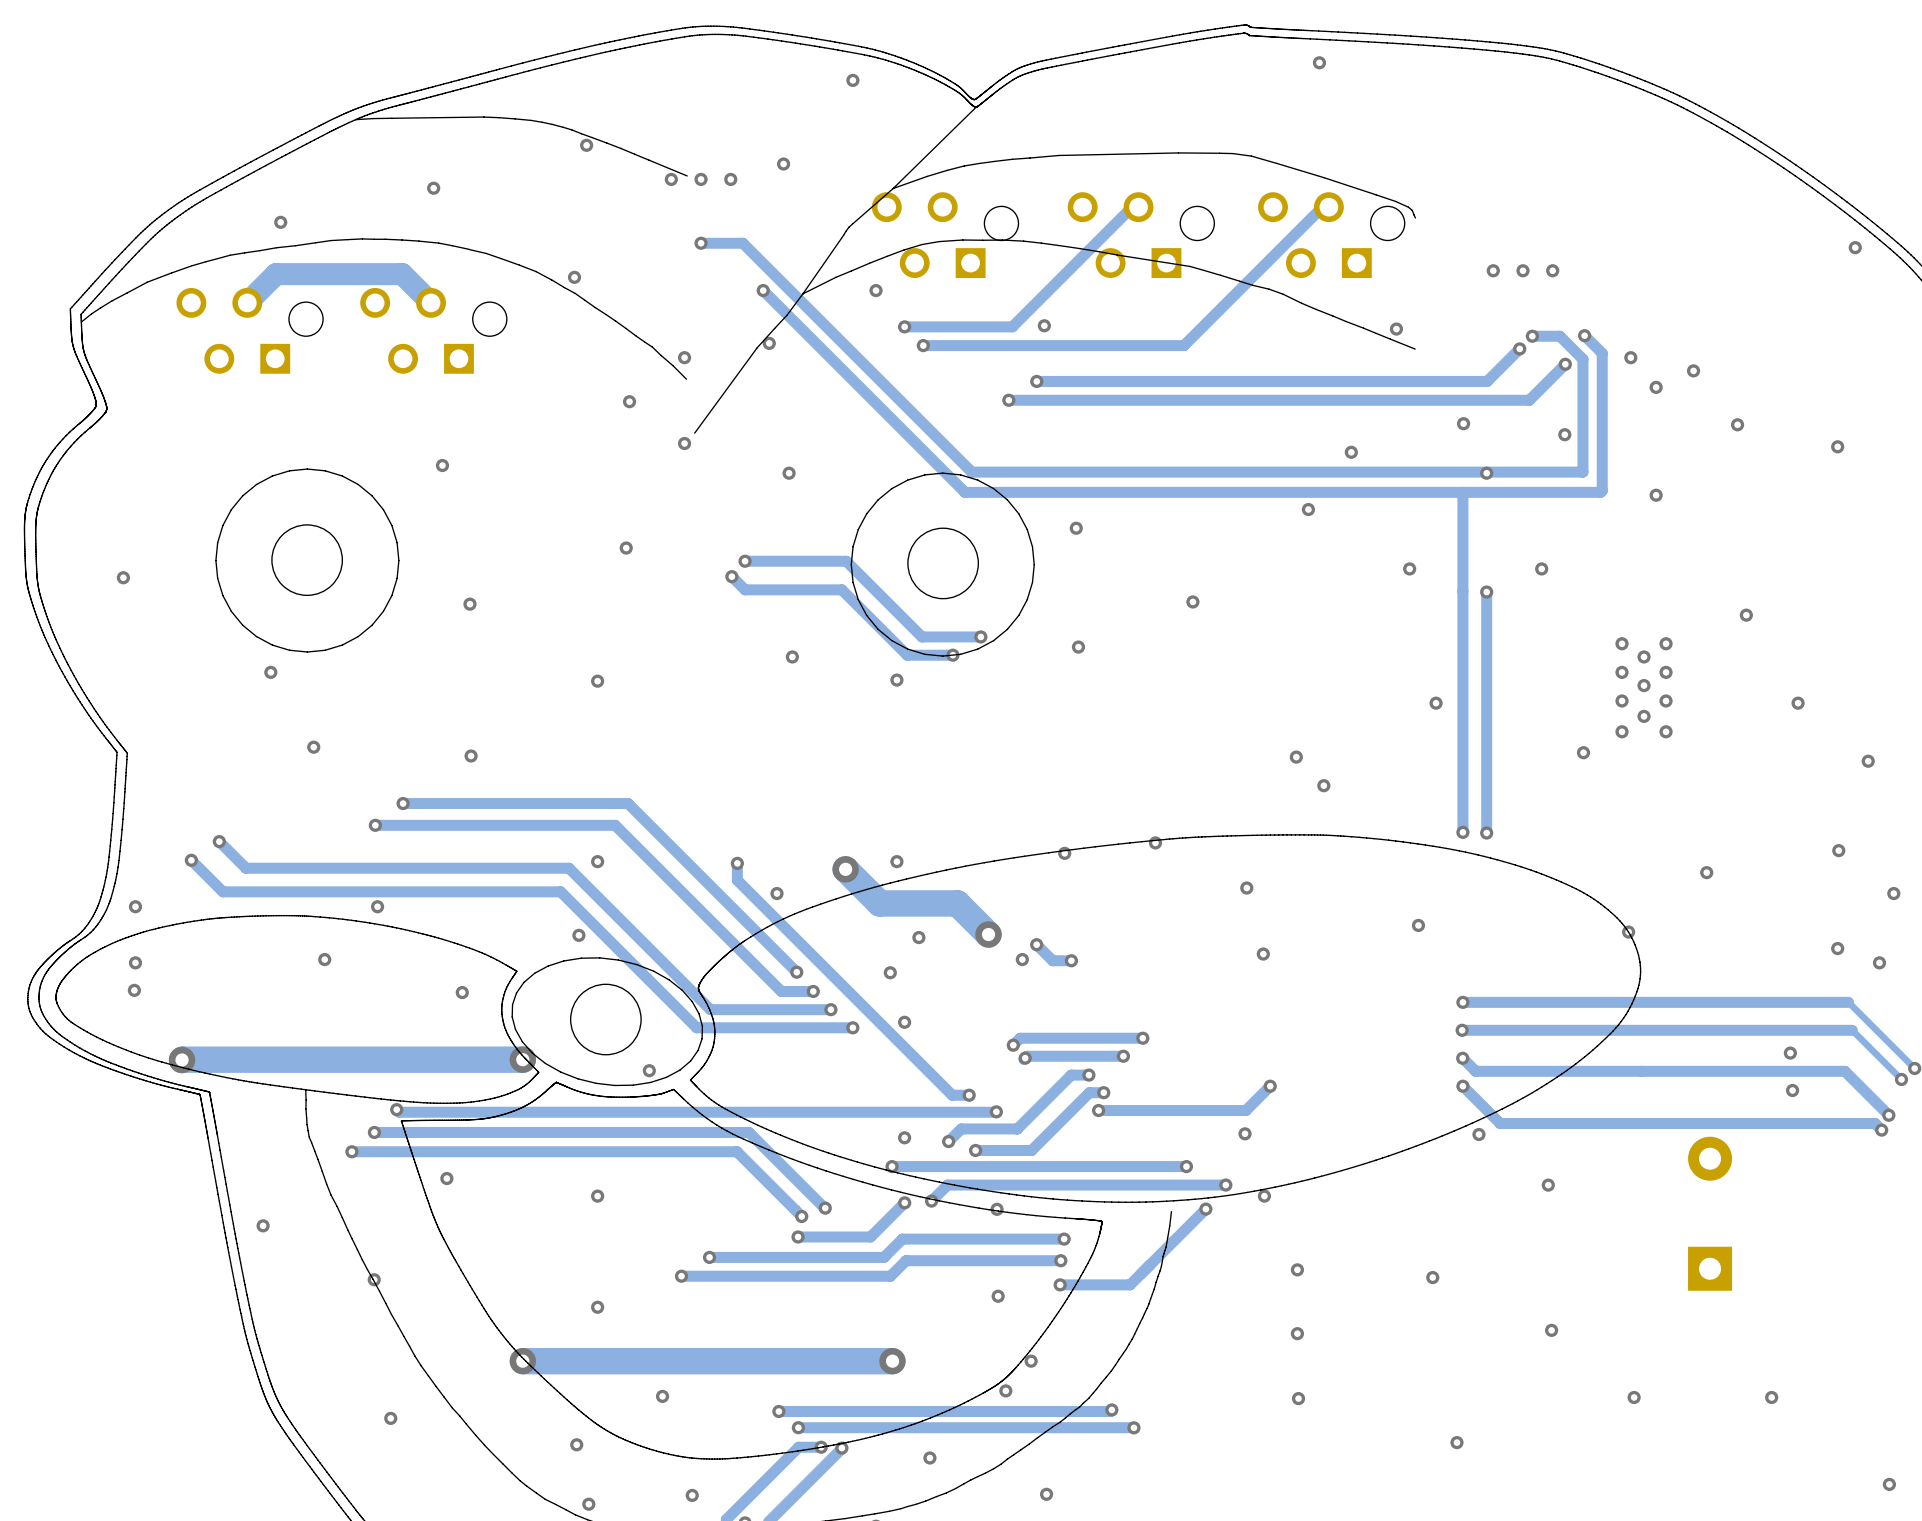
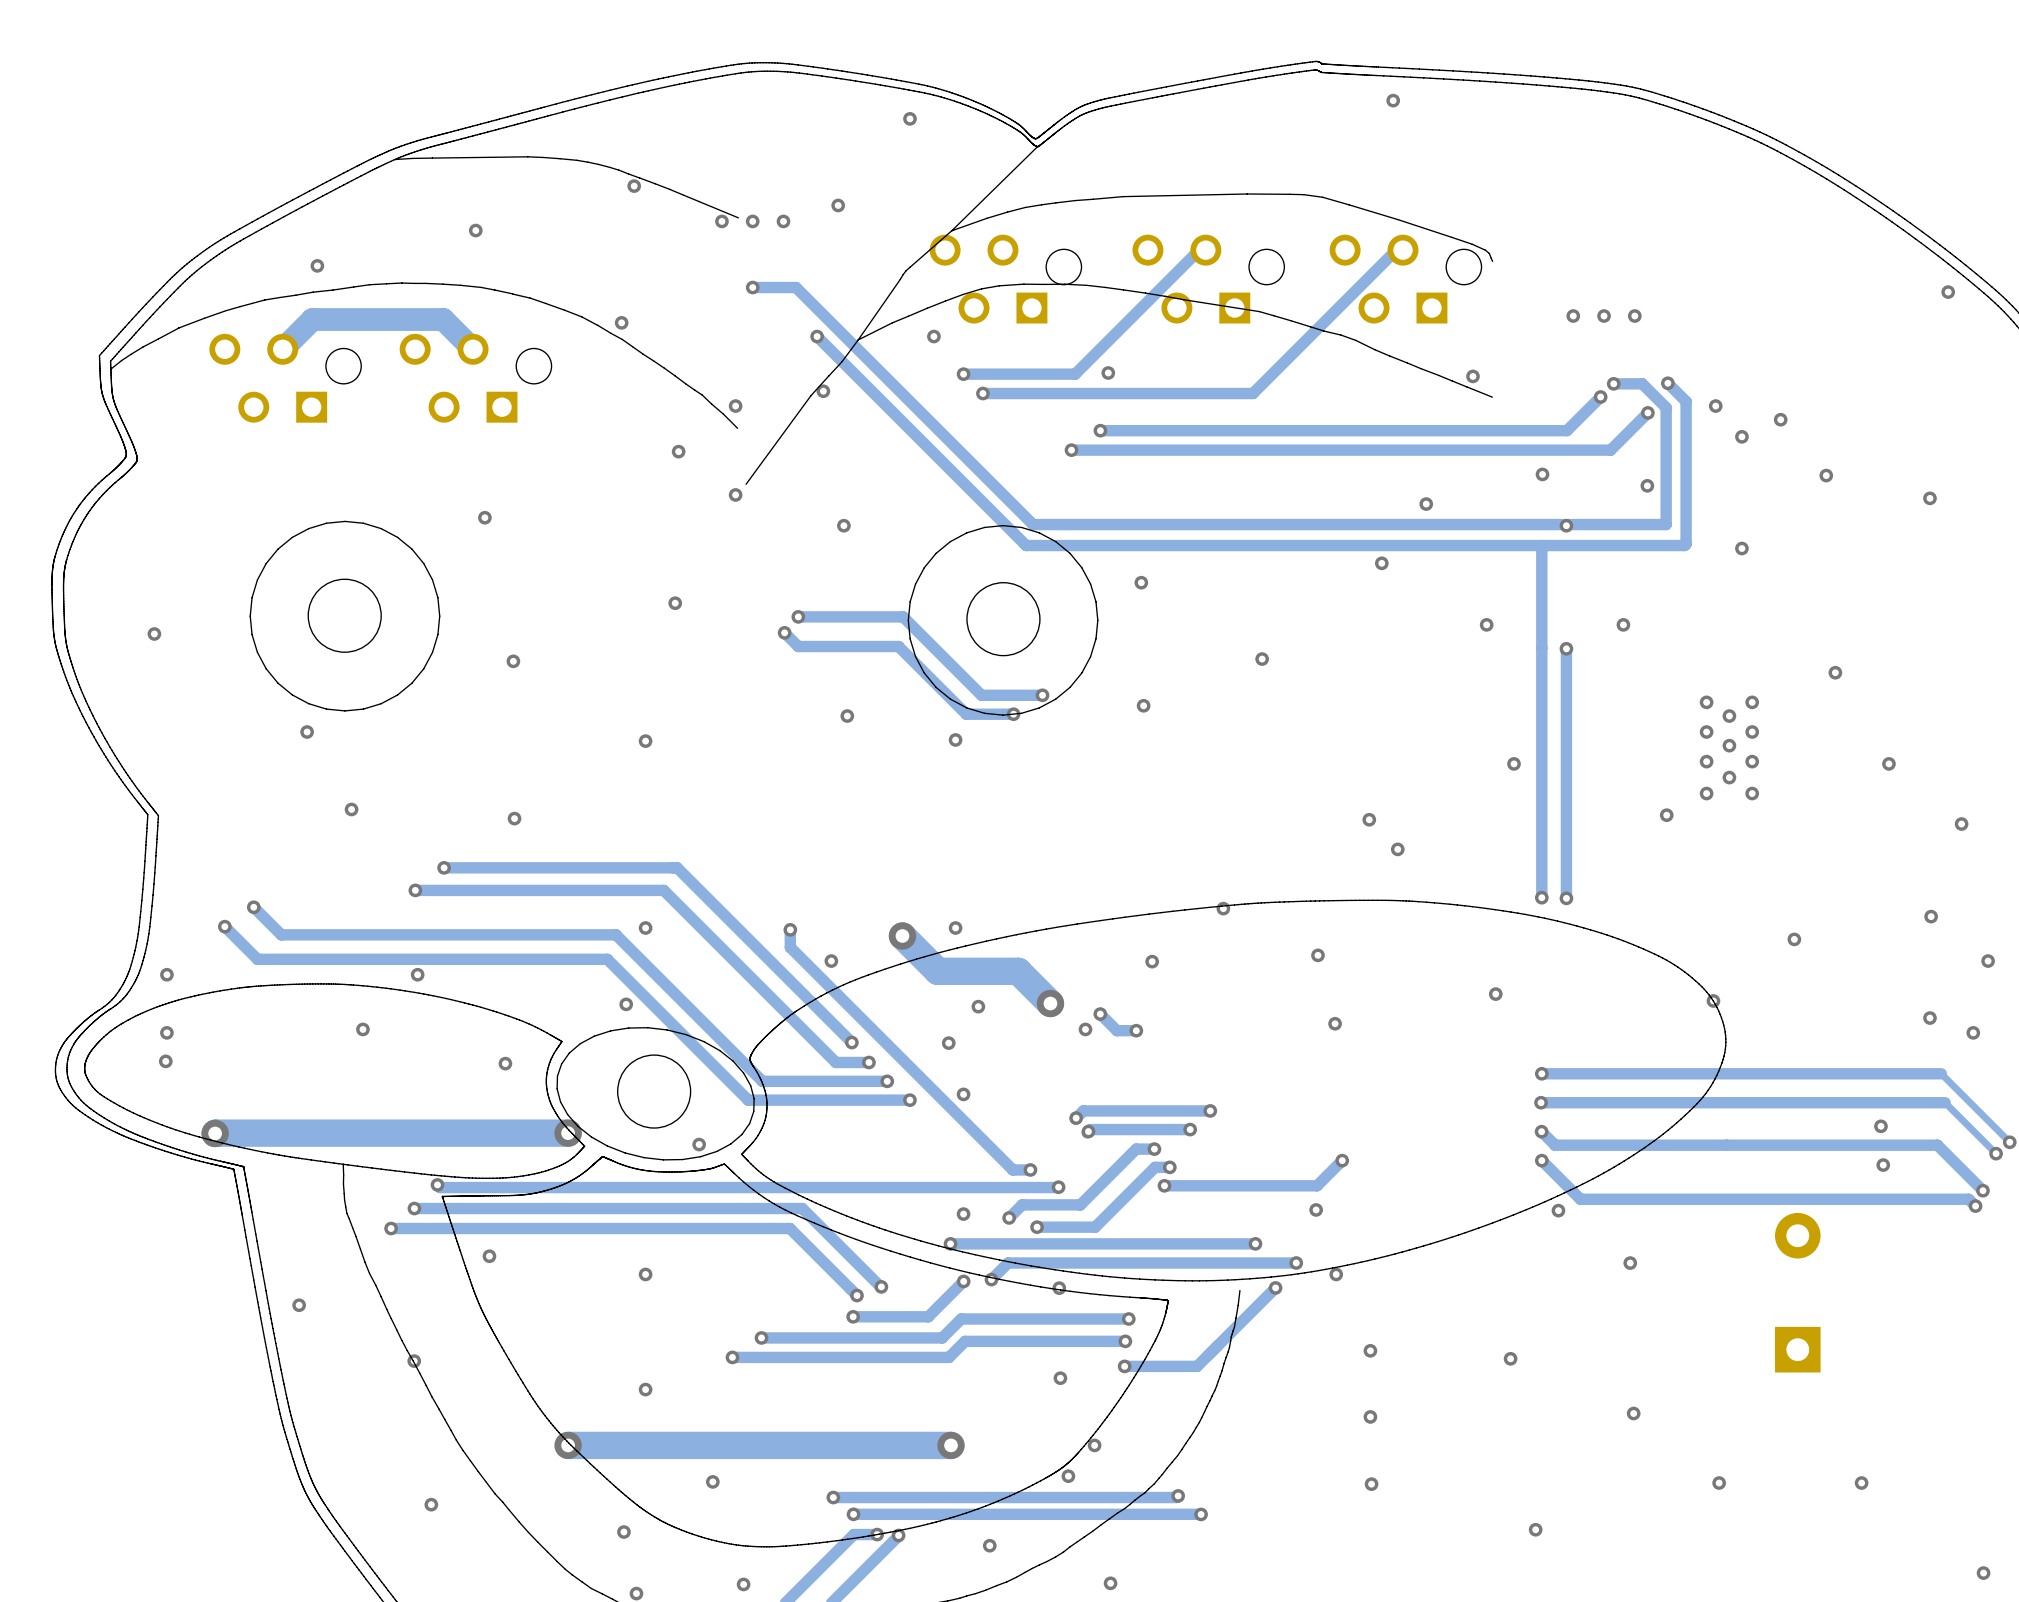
via position: (1064, 853) -> (1152, 961)

